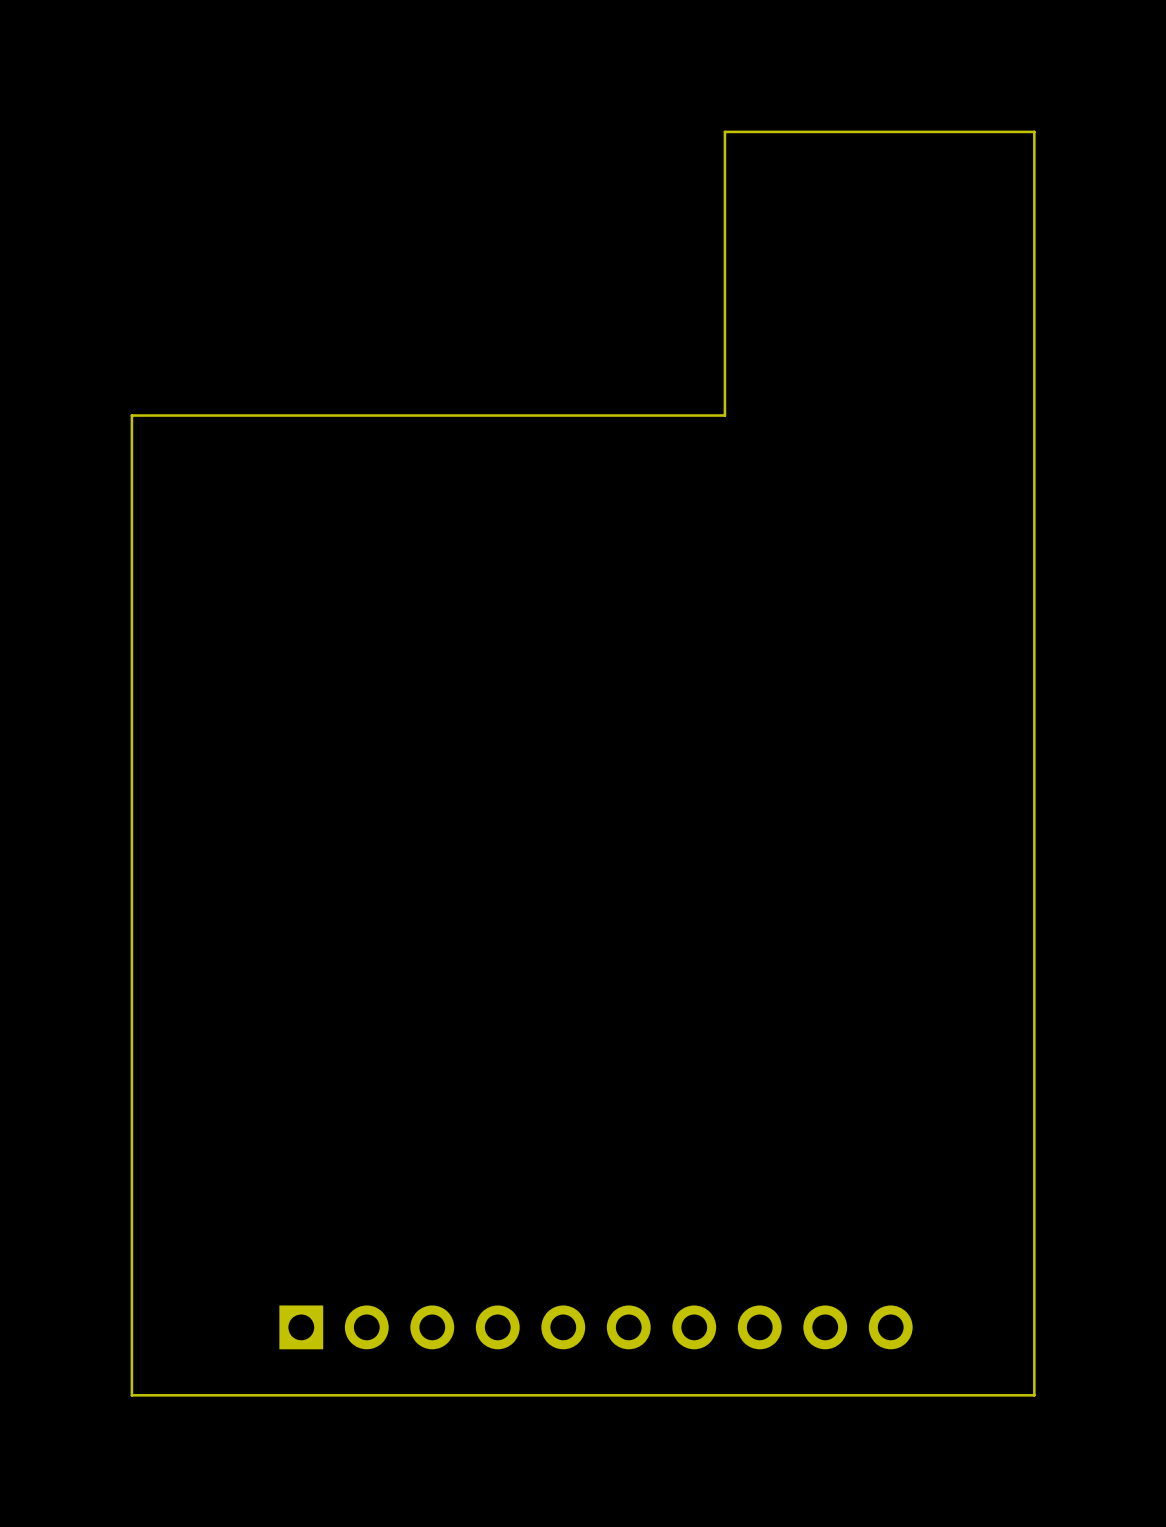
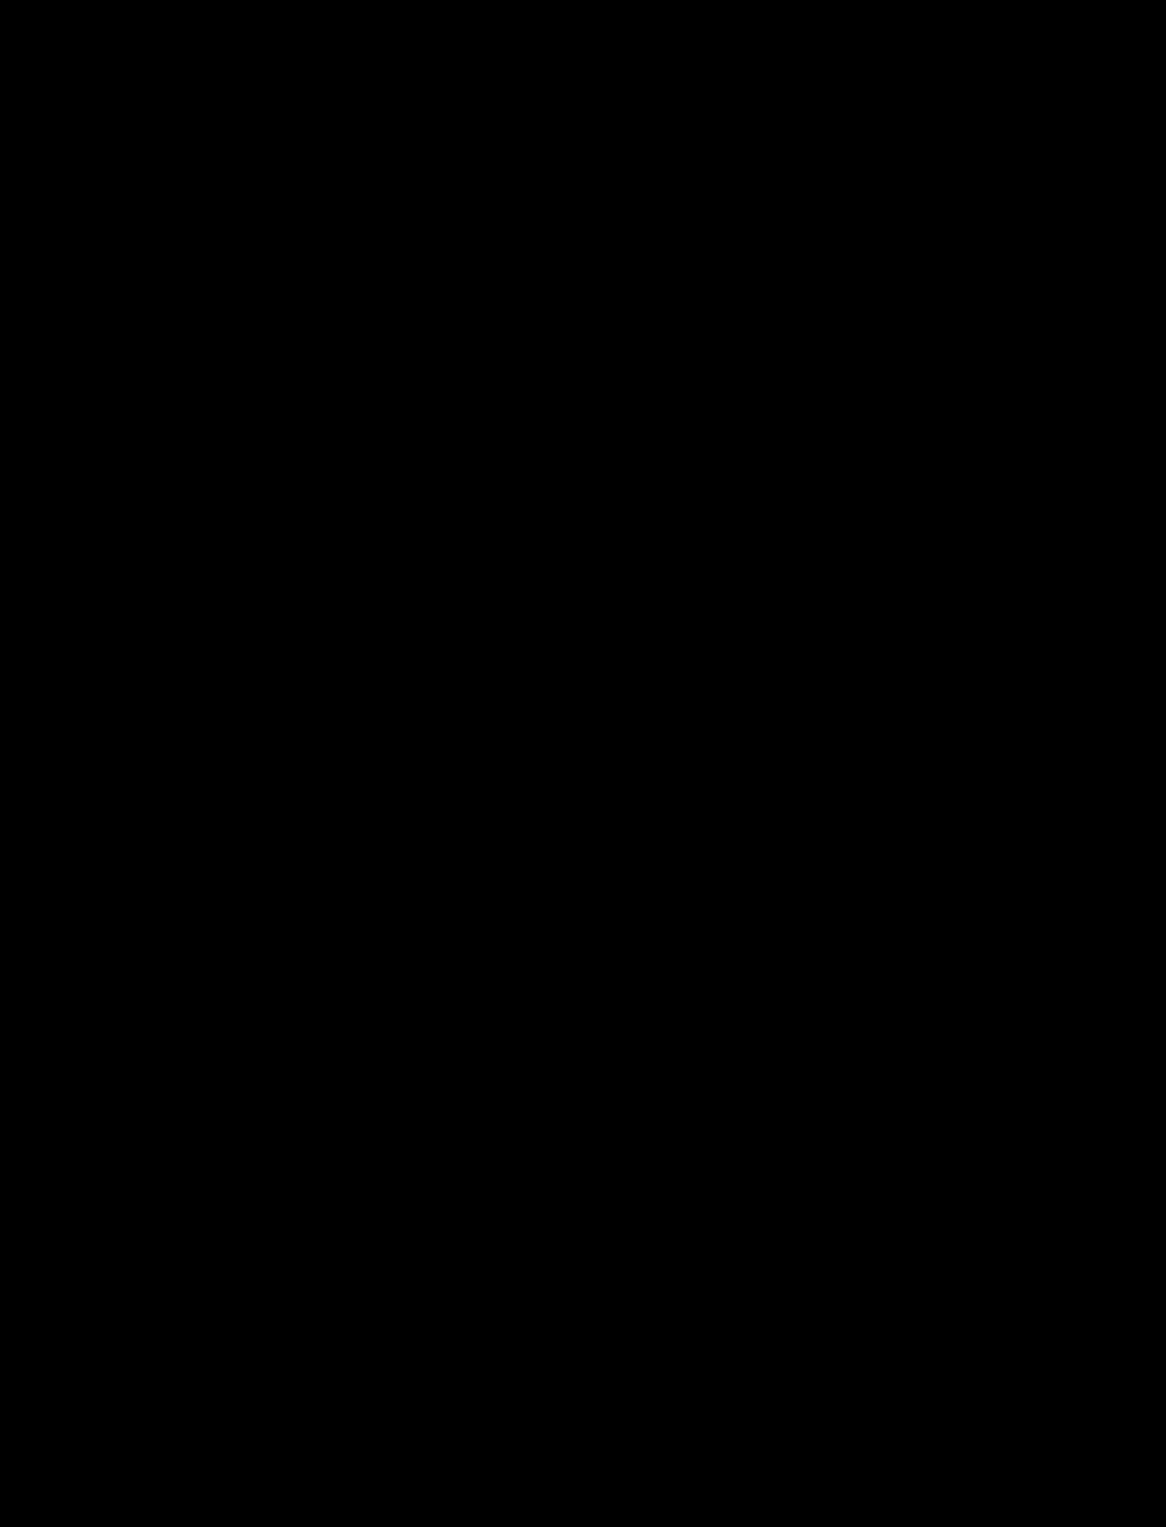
board edge: (1034, 131) (724, 131) (724, 415) (131, 415) (131, 1395) (1034, 1395) (1034, 131) -> none
part: (596, 1327) -> none

